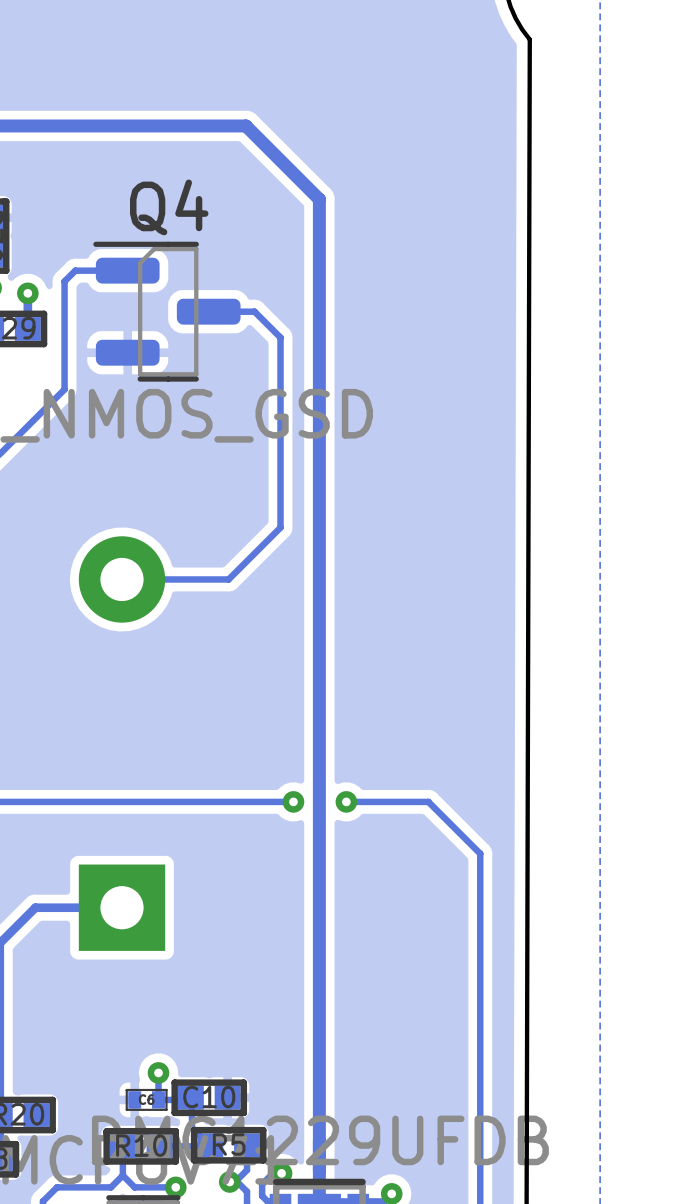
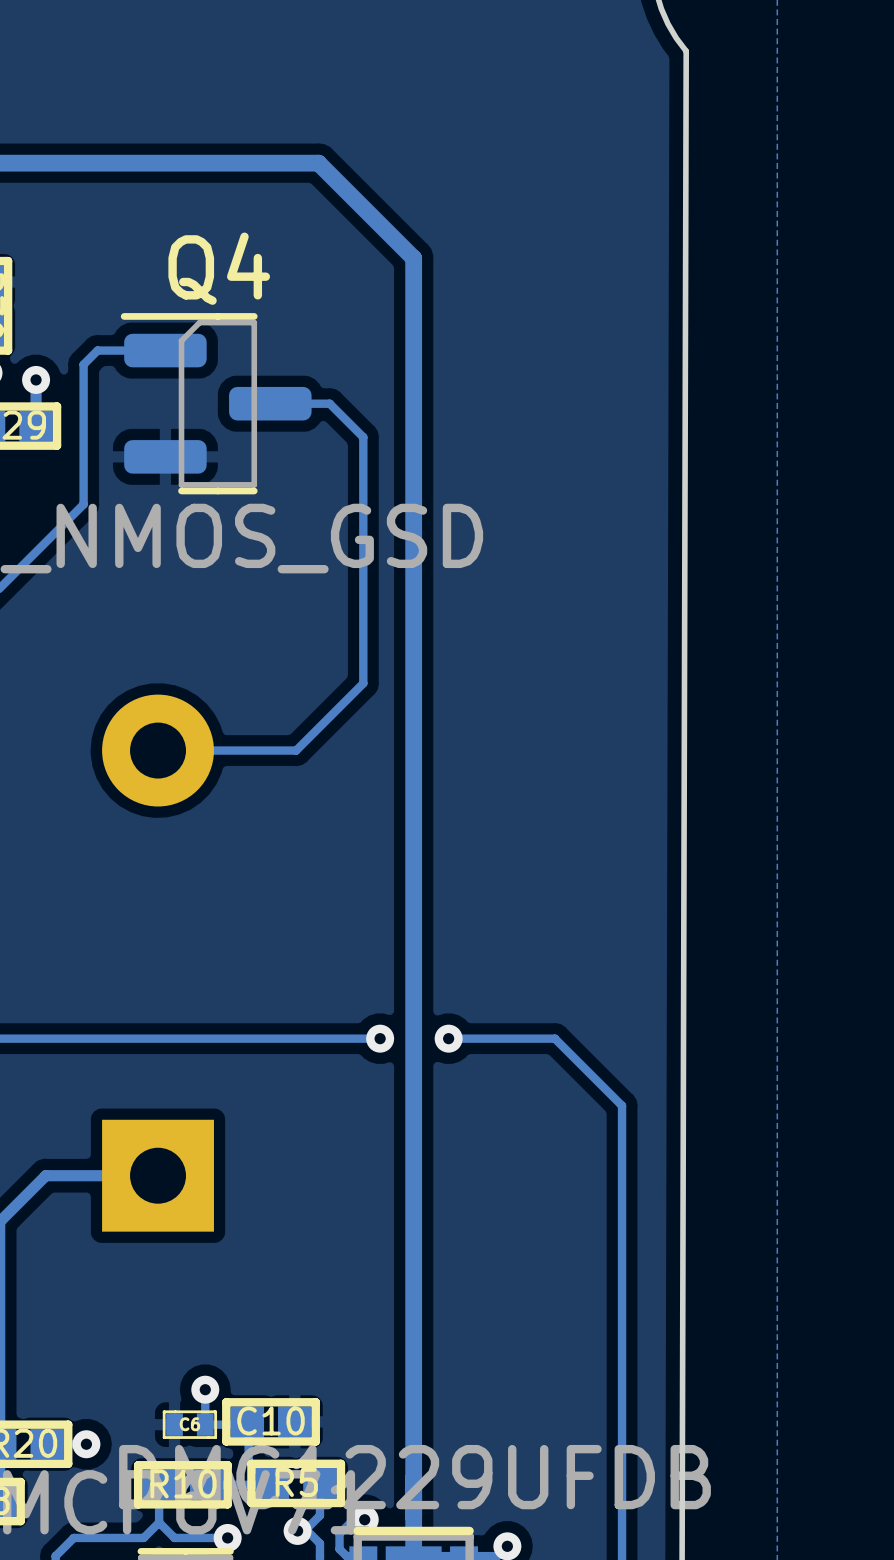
via: none -> (86, 1444)

